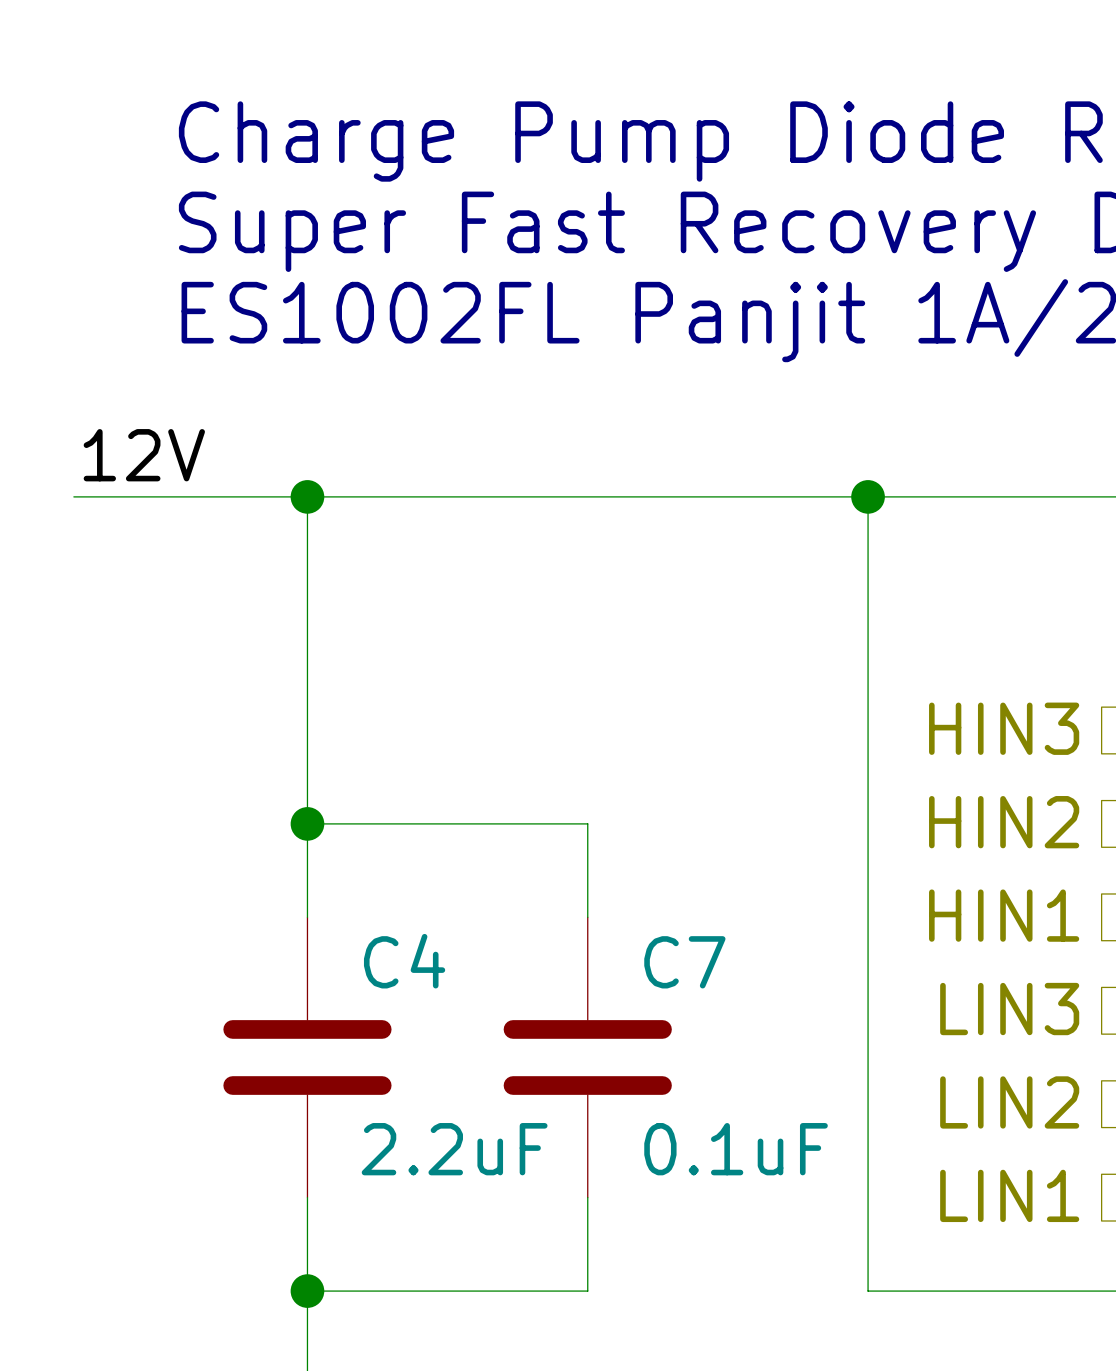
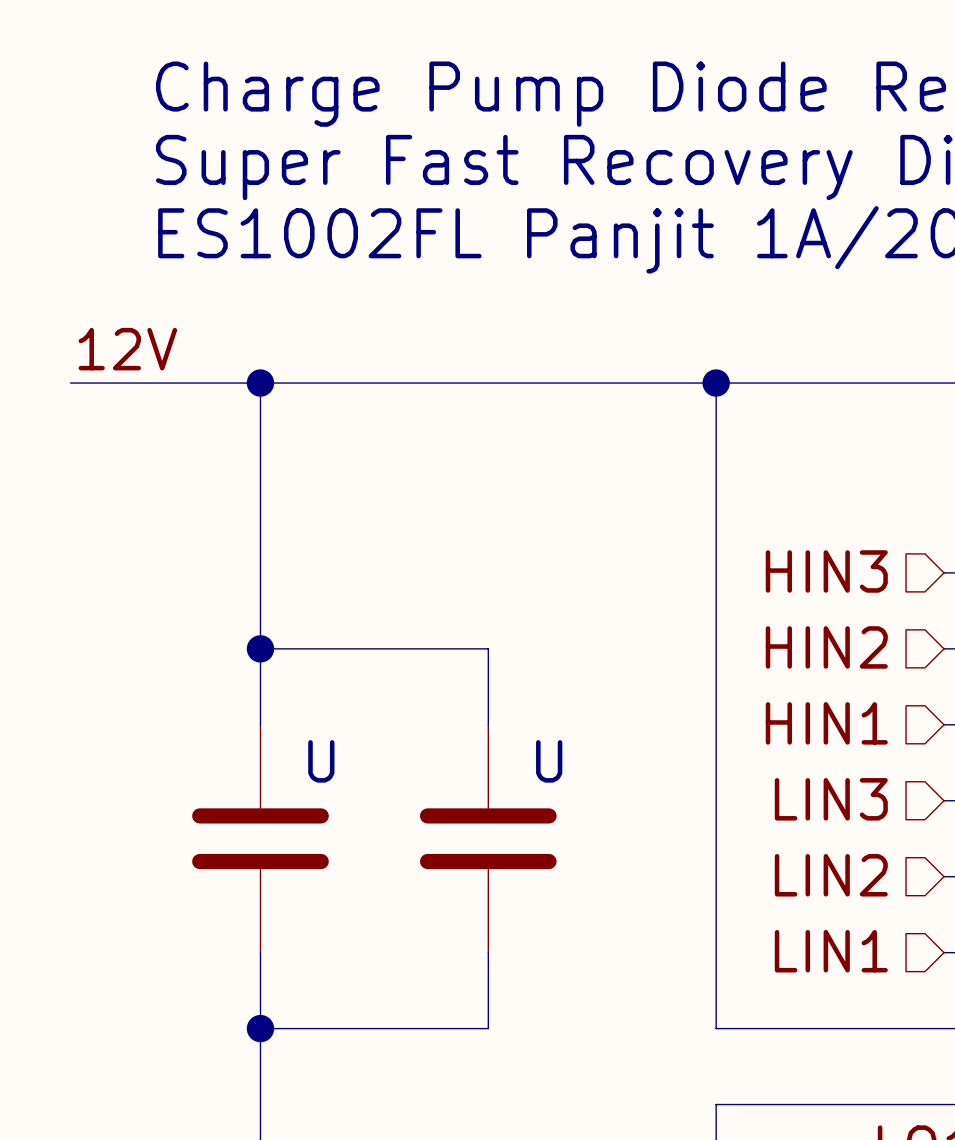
C4 name: C4 (404, 961) -> U (321, 761)
C7 name: C7 (684, 962) -> U (549, 761)
C4 value: 2.2uF (454, 1149) -> none
C7 value: 0.1uF (736, 1149) -> none

